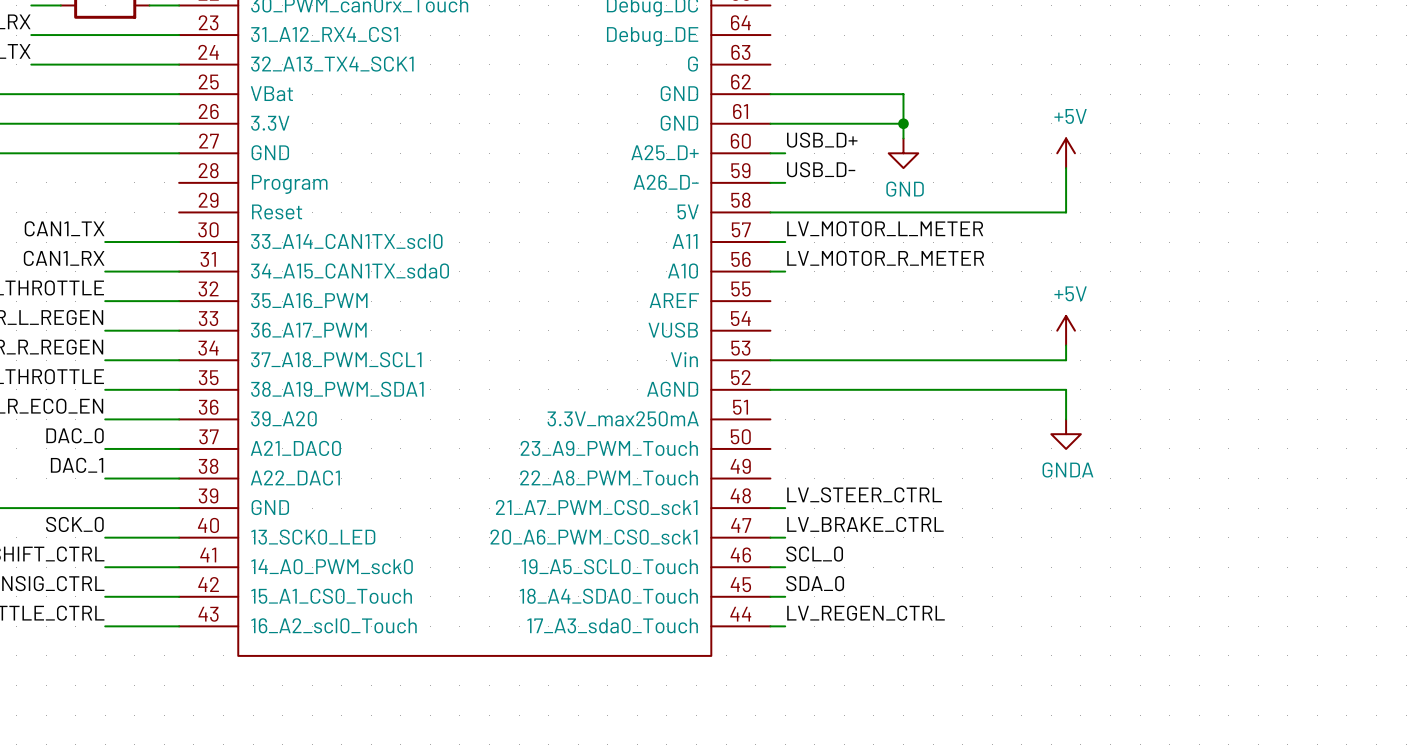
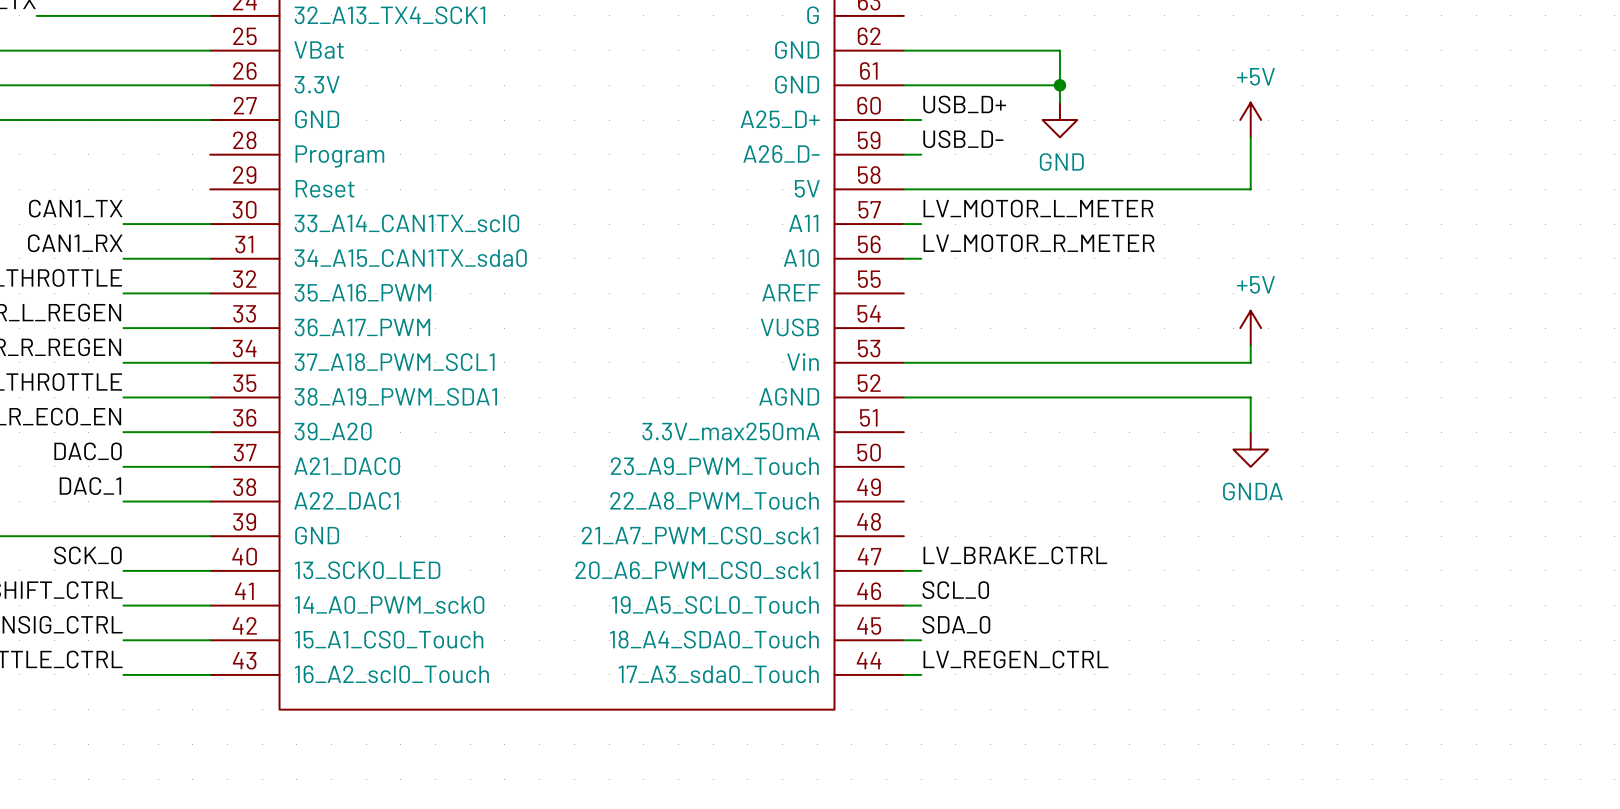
label: LV_STEER_CTRL (864, 494) -> none
wire: (770, 508) (785, 508) -> none

